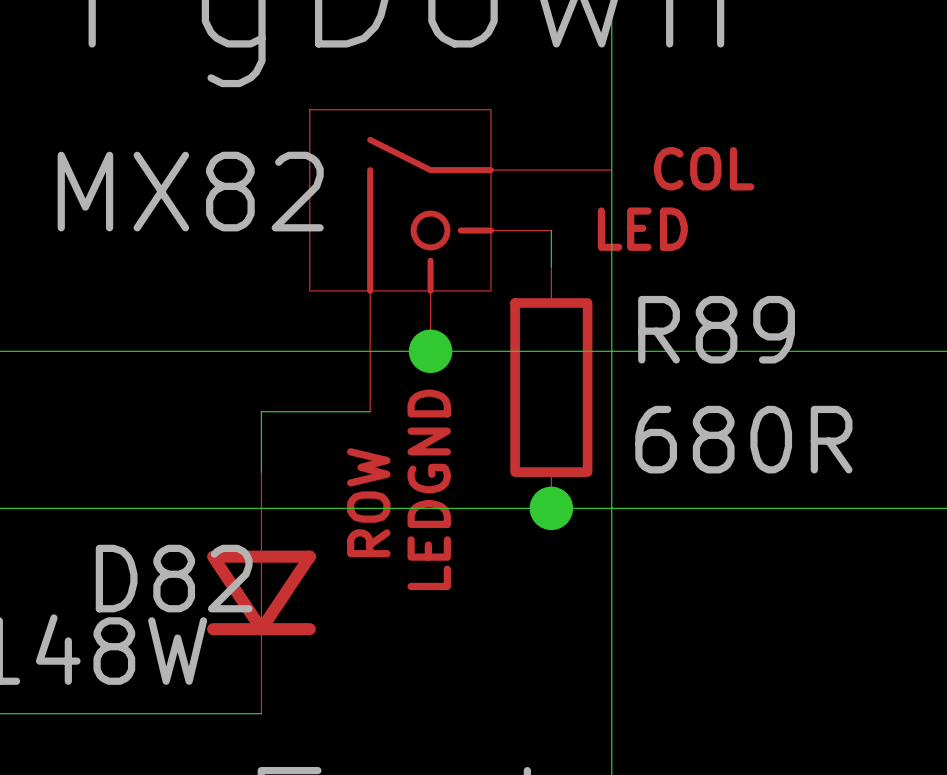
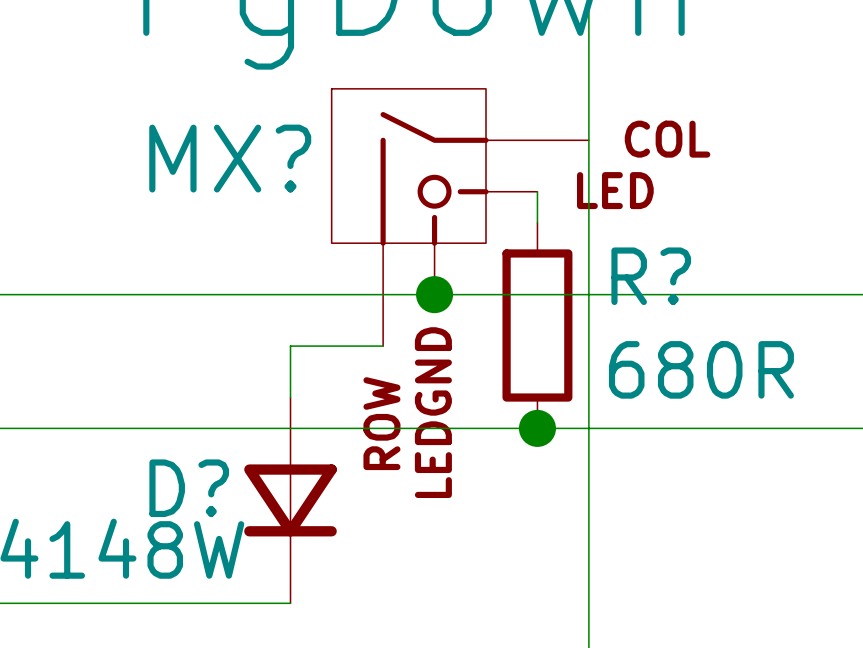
MX82 name: MX82 (190, 191) -> MX? (230, 158)
R89 name: R89 (716, 329) -> R? (651, 276)
D82 name: D82 (174, 578) -> D? (189, 488)

